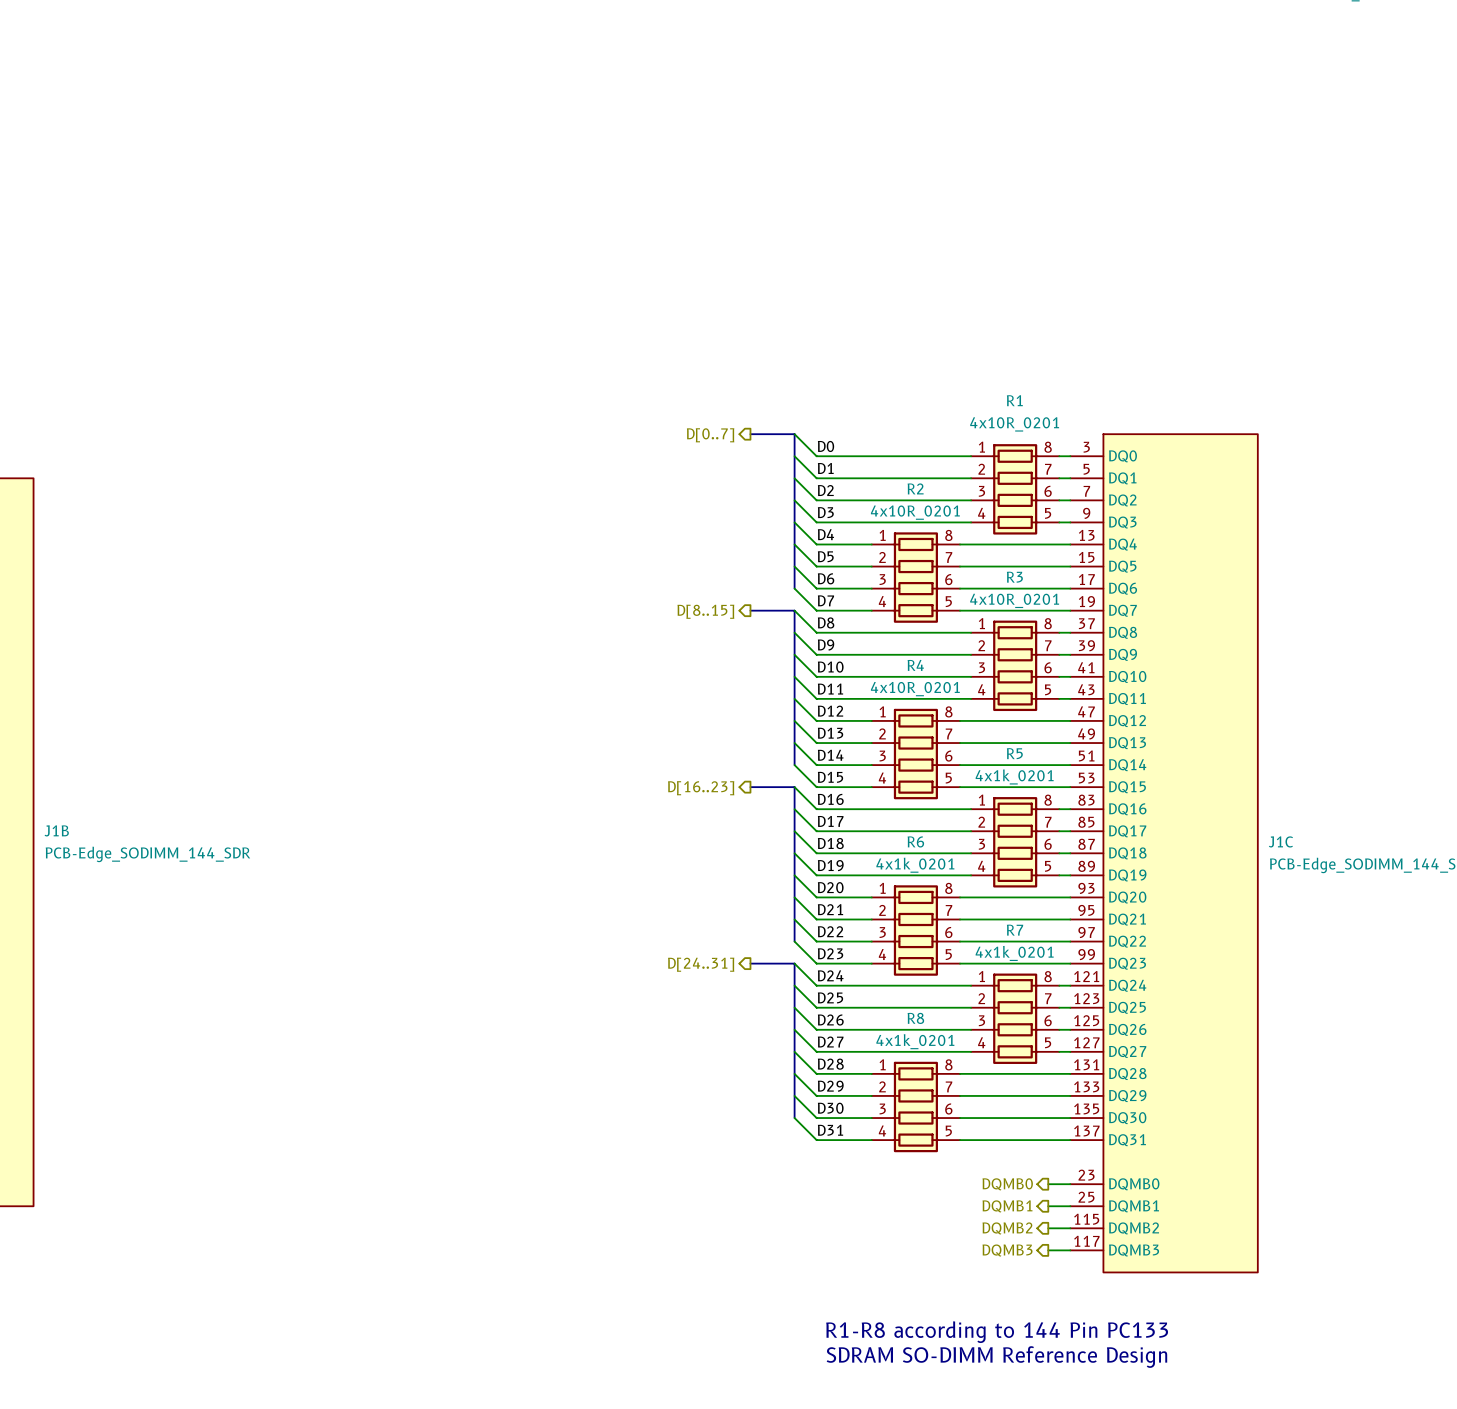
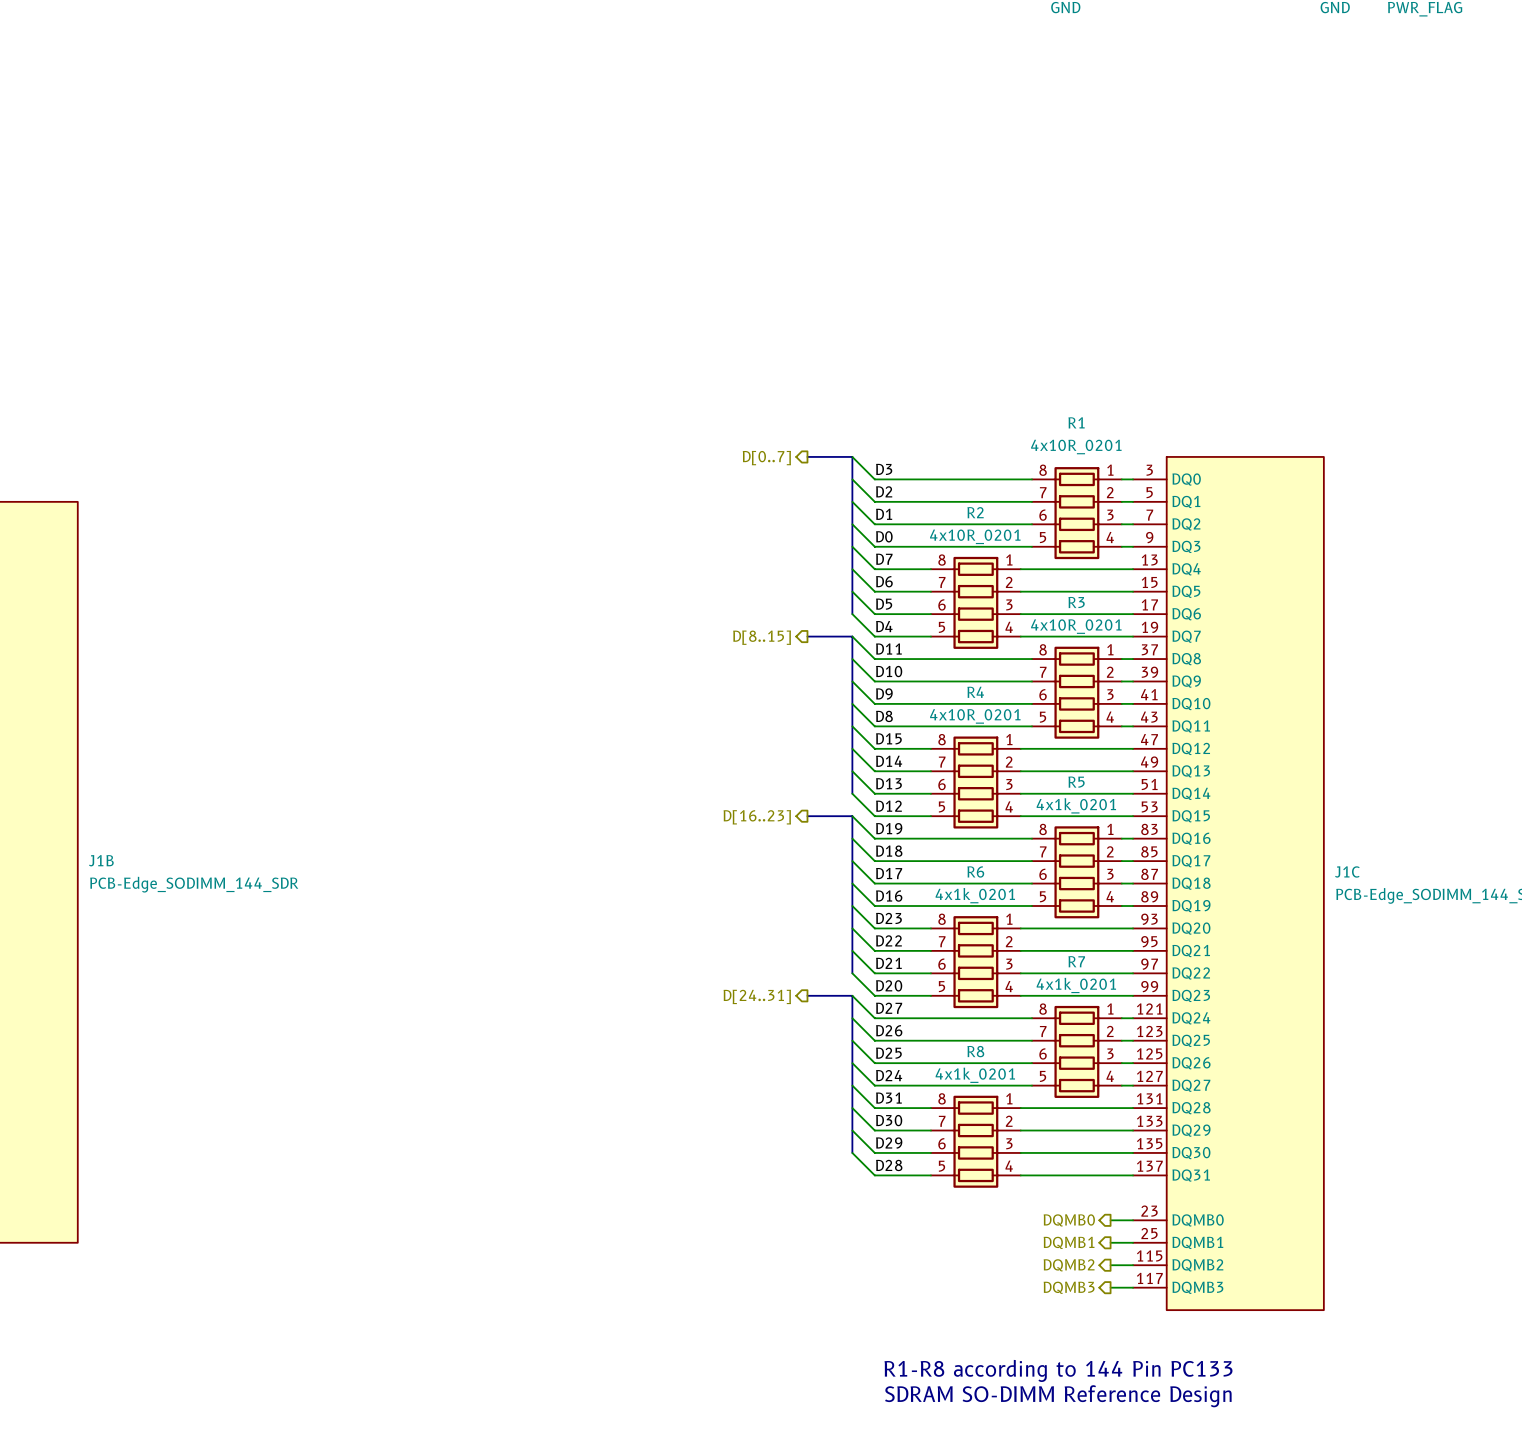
label: D0 (826, 446) -> D3 (884, 469)
label: D1 (825, 468) -> D2 (884, 491)
R1 flip: as is (1015, 489) -> left-right (1076, 513)
label: D2 (825, 490) -> D1 (884, 514)
label: D3 (825, 512) -> D0 (884, 536)
label: D4 (825, 534) -> D7 (884, 559)
label: D5 (825, 556) -> D6 (884, 581)
R2 flip: as is (915, 577) -> left-right (975, 602)
label: D6 (826, 578) -> D5 (884, 604)
label: D7 (825, 600) -> D4 (884, 626)
label: D8 (826, 622) -> D11 (888, 649)
label: D9 (826, 645) -> D10 (889, 671)
R3 flip: as is (1015, 665) -> left-right (1076, 692)
label: D10 (830, 667) -> D9 (884, 693)
label: D11 (830, 689) -> D8 (884, 716)
label: D12 (830, 711) -> D15 (888, 738)
label: D13 (830, 733) -> D14 (889, 761)
R4 flip: as is (915, 754) -> left-right (975, 782)
label: D14 (830, 755) -> D13 (888, 783)
label: D15 (830, 777) -> D12 (888, 806)
label: D16 (830, 799) -> D19 (889, 828)
label: D17 (830, 821) -> D18 (889, 851)
R5 flip: as is (1015, 842) -> left-right (1076, 872)
label: D18 (830, 843) -> D17 (889, 873)
label: D19 (830, 865) -> D16 (889, 896)
label: D20 (830, 887) -> D23 (888, 918)
label: D21 (830, 909) -> D22 (888, 940)
R6 flip: as is (915, 930) -> left-right (975, 962)
label: D22 (830, 931) -> D21 (888, 963)
label: D23 (830, 953) -> D20 (889, 985)
label: D24 (830, 975) -> D27 (889, 1008)
label: D25 (830, 997) -> D26 (889, 1030)
R7 flip: as is (1015, 1018) -> left-right (1076, 1051)
label: D26 (830, 1020) -> D25 (888, 1053)
label: D27 (830, 1042) -> D24 (889, 1075)
label: D28 (830, 1064) -> D31 (888, 1098)
label: D29 (830, 1086) -> D30 (889, 1120)
R8 flip: as is (915, 1106) -> left-right (975, 1141)
label: D30 (830, 1108) -> D29 (889, 1143)
label: D31 (830, 1130) -> D28 (889, 1165)

